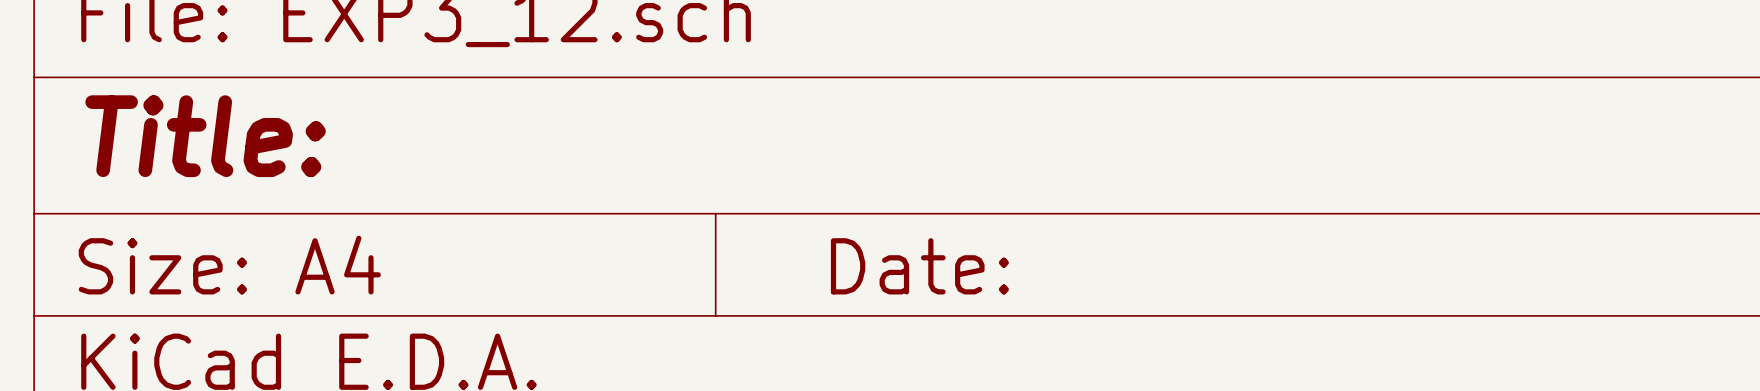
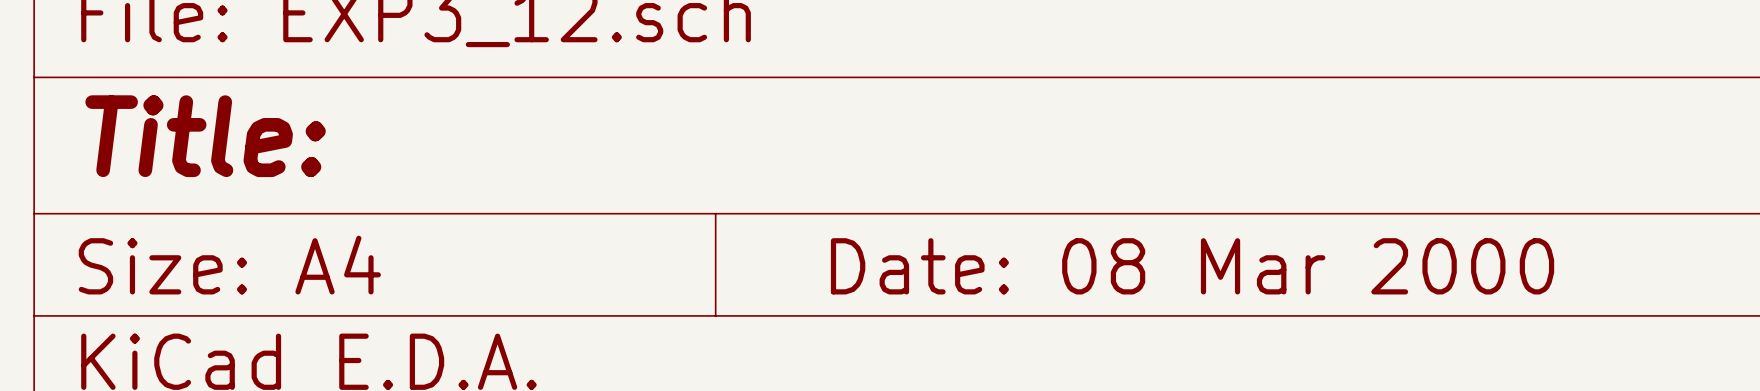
title block: Date: (919, 266) -> Date: 08 Mar 2000 (1192, 266)

